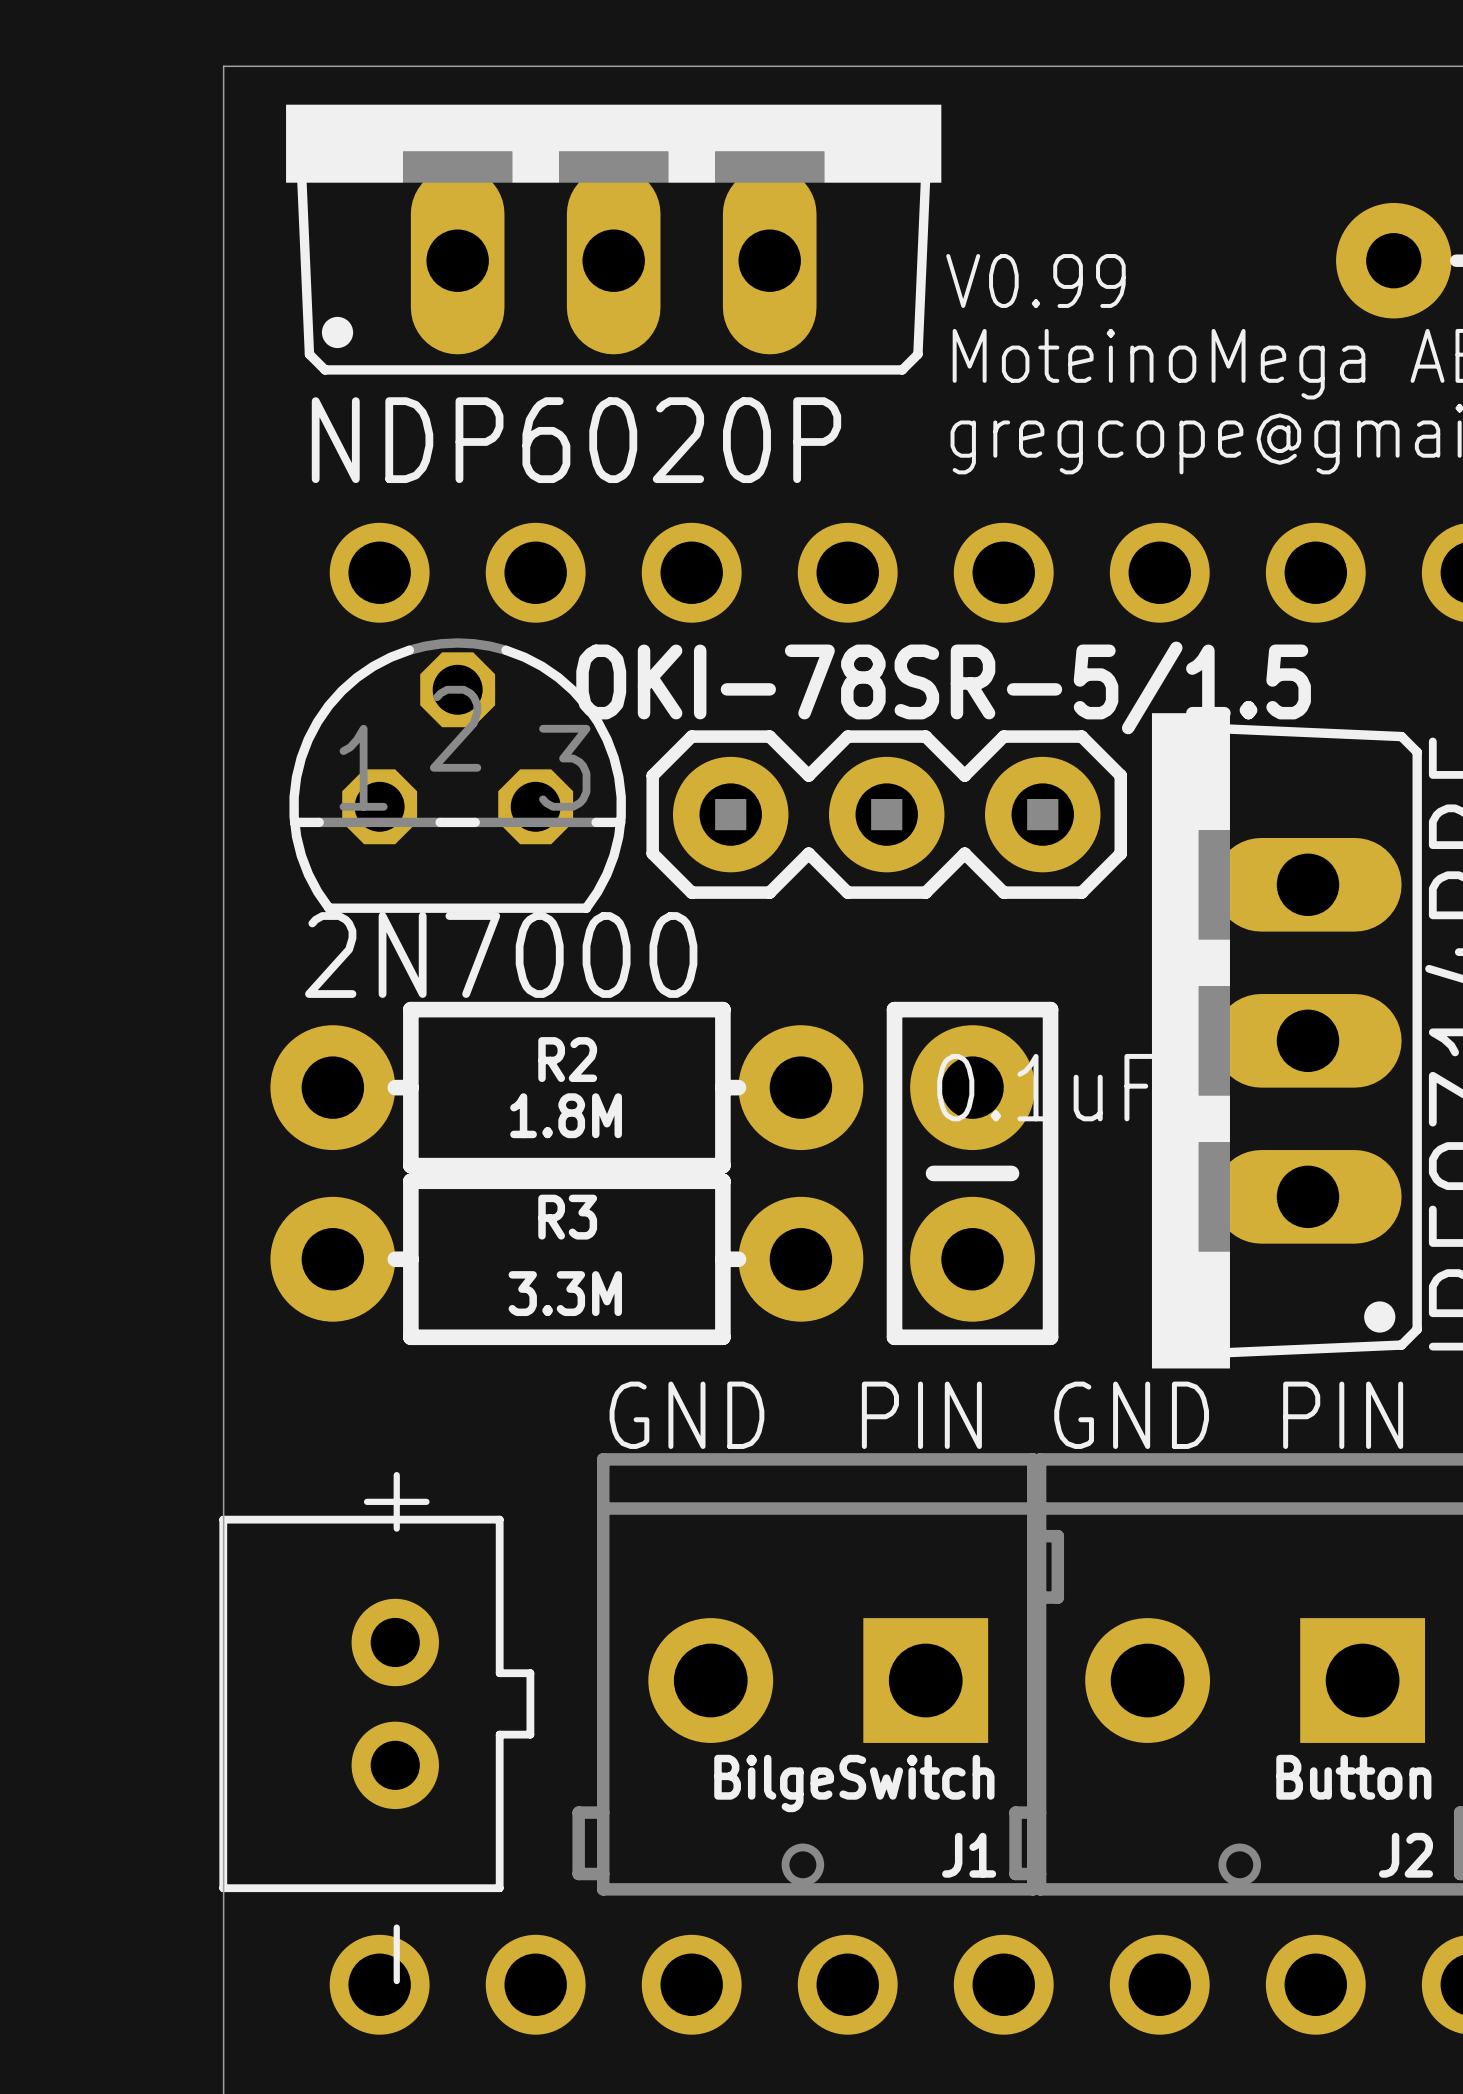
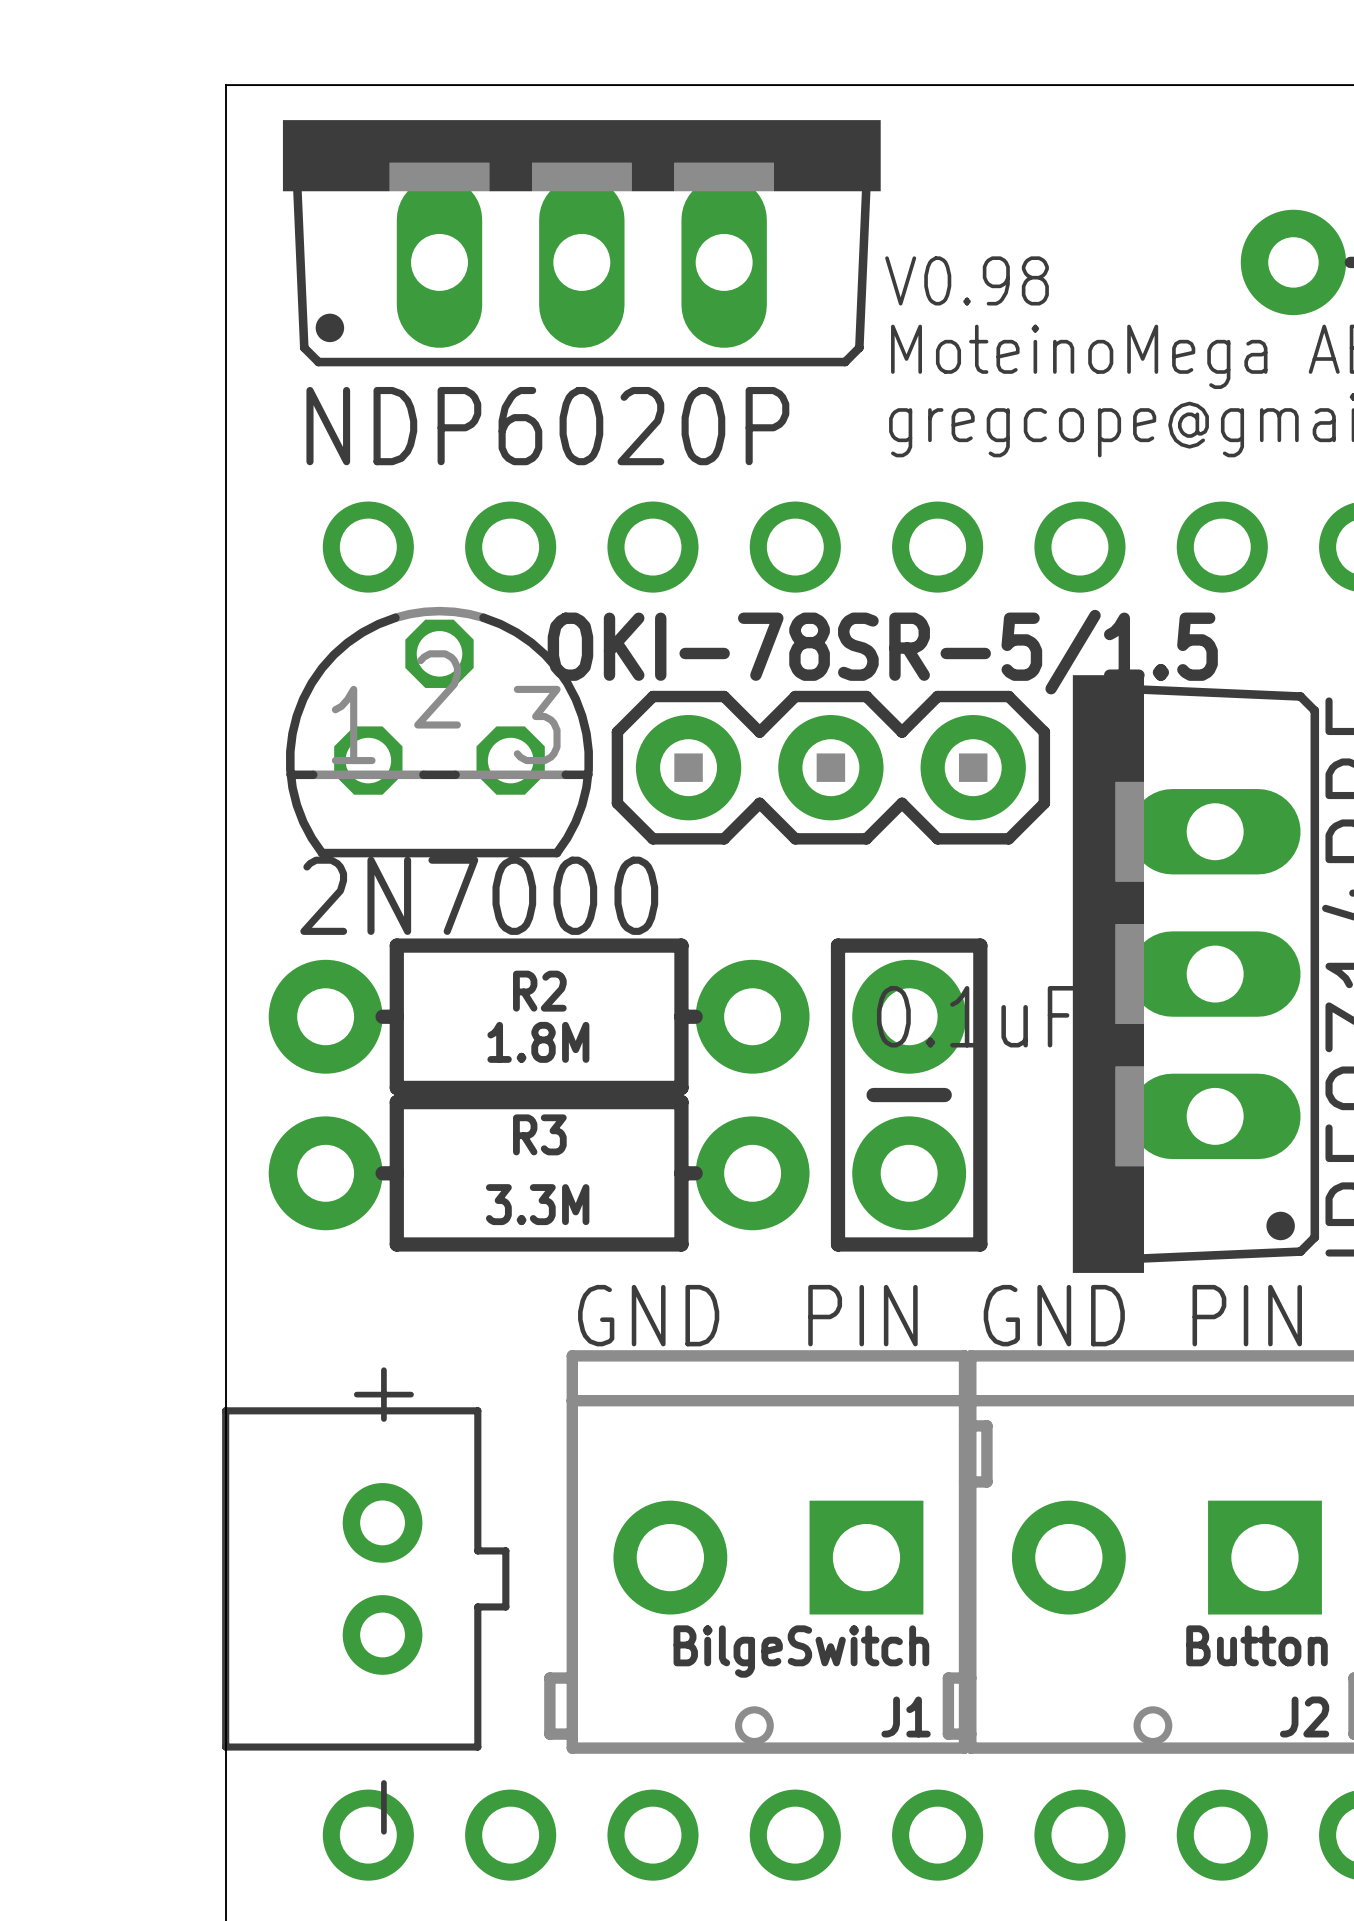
text: V0.99 (1035, 280) -> V0.98 (967, 280)

